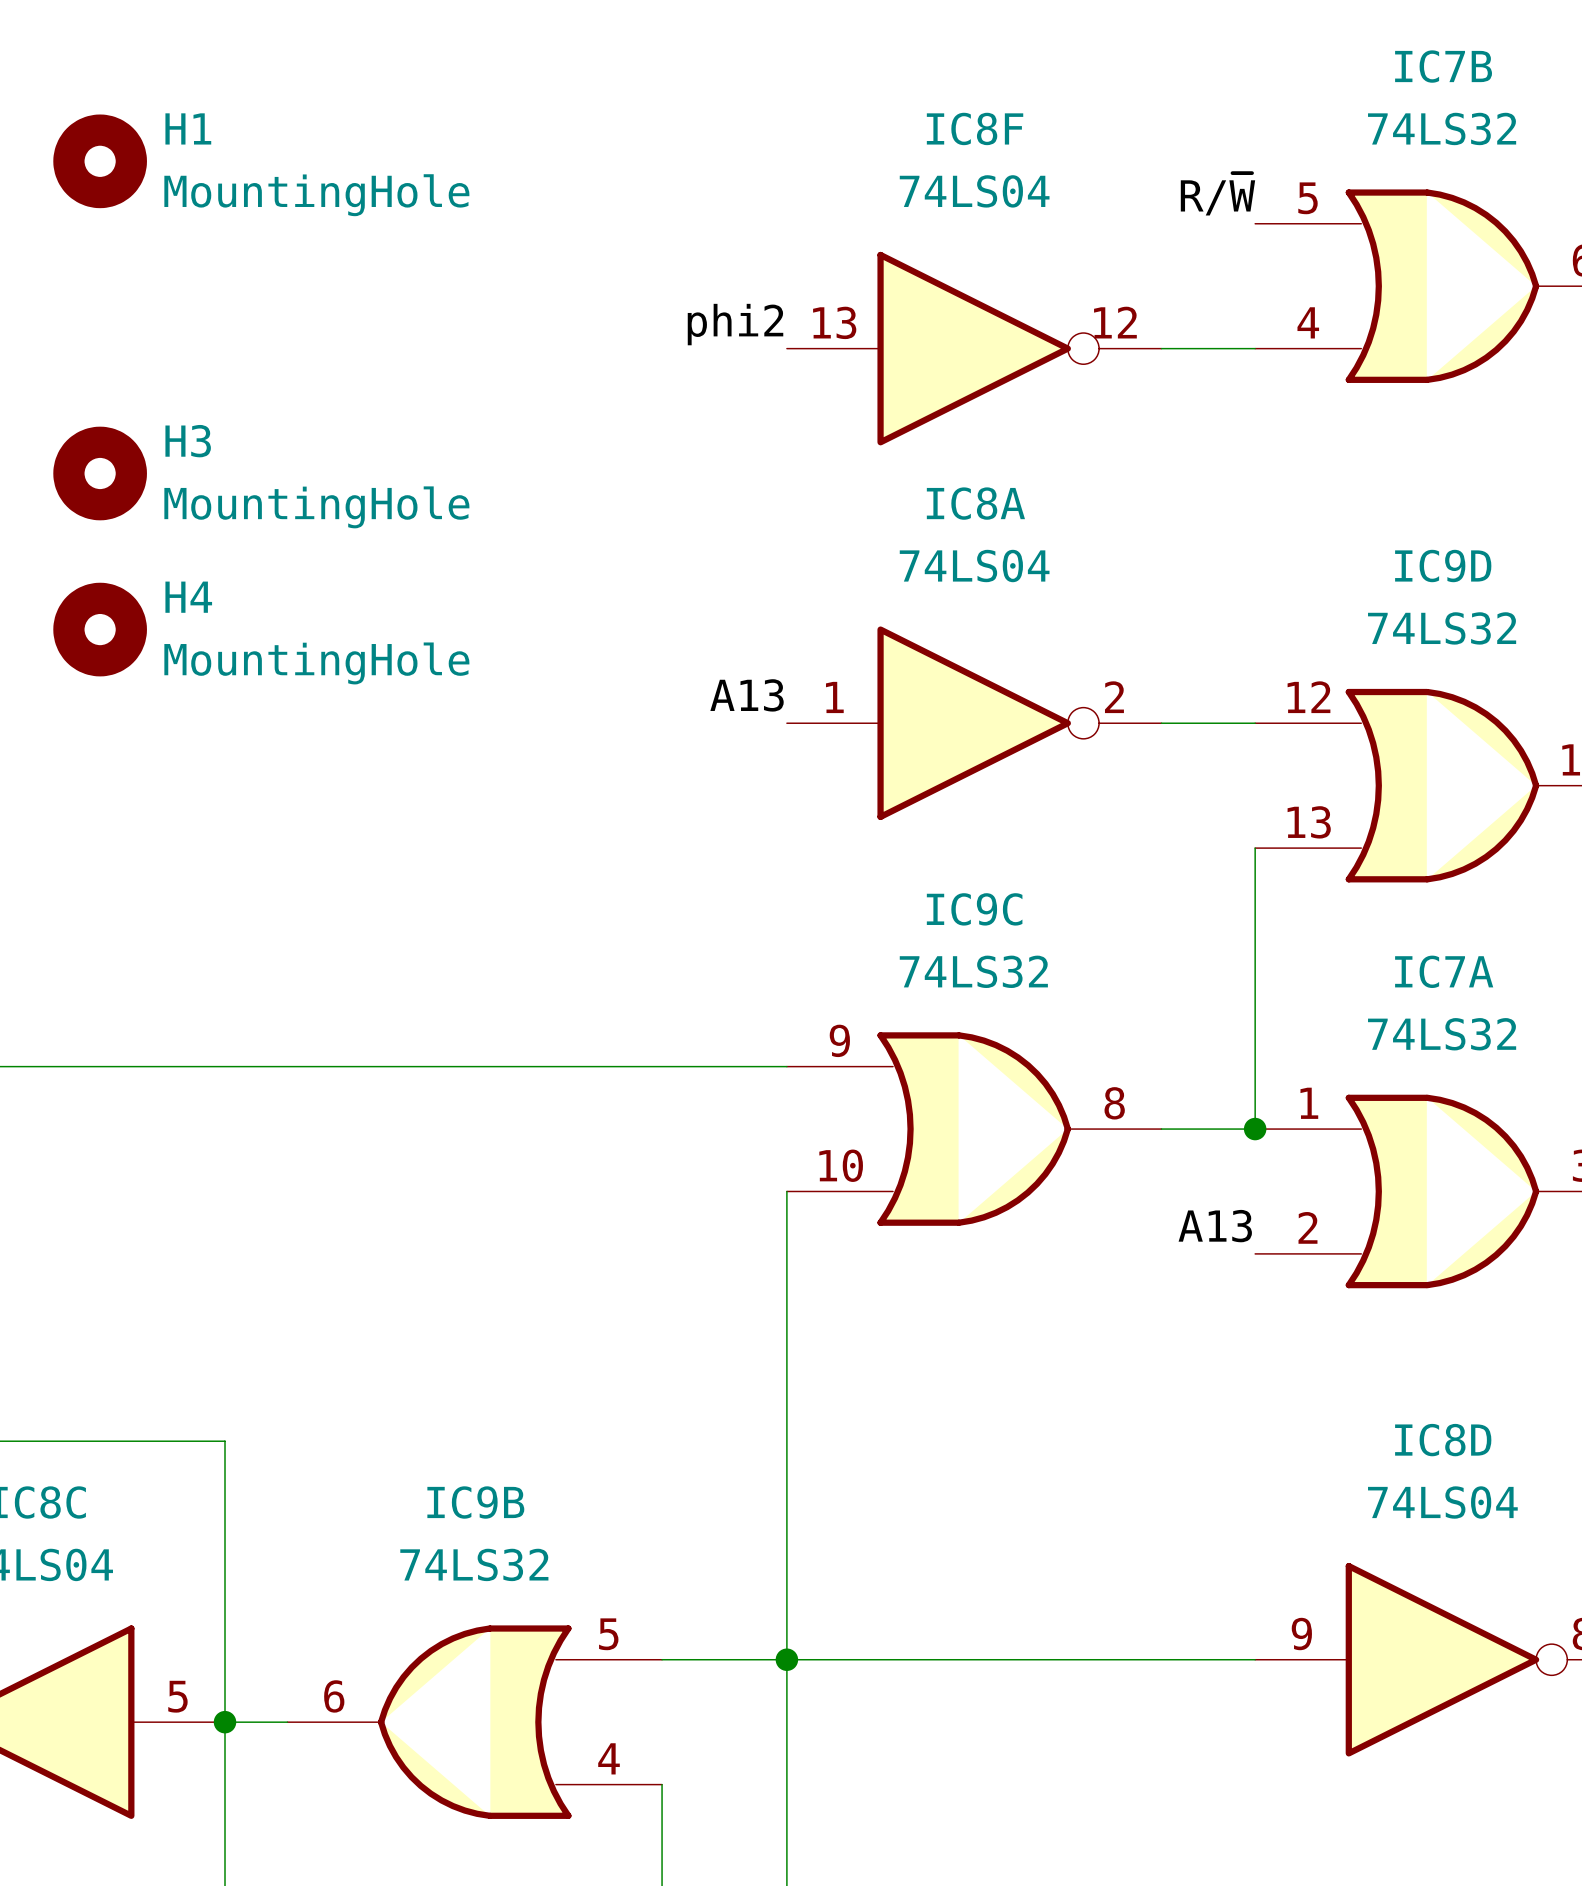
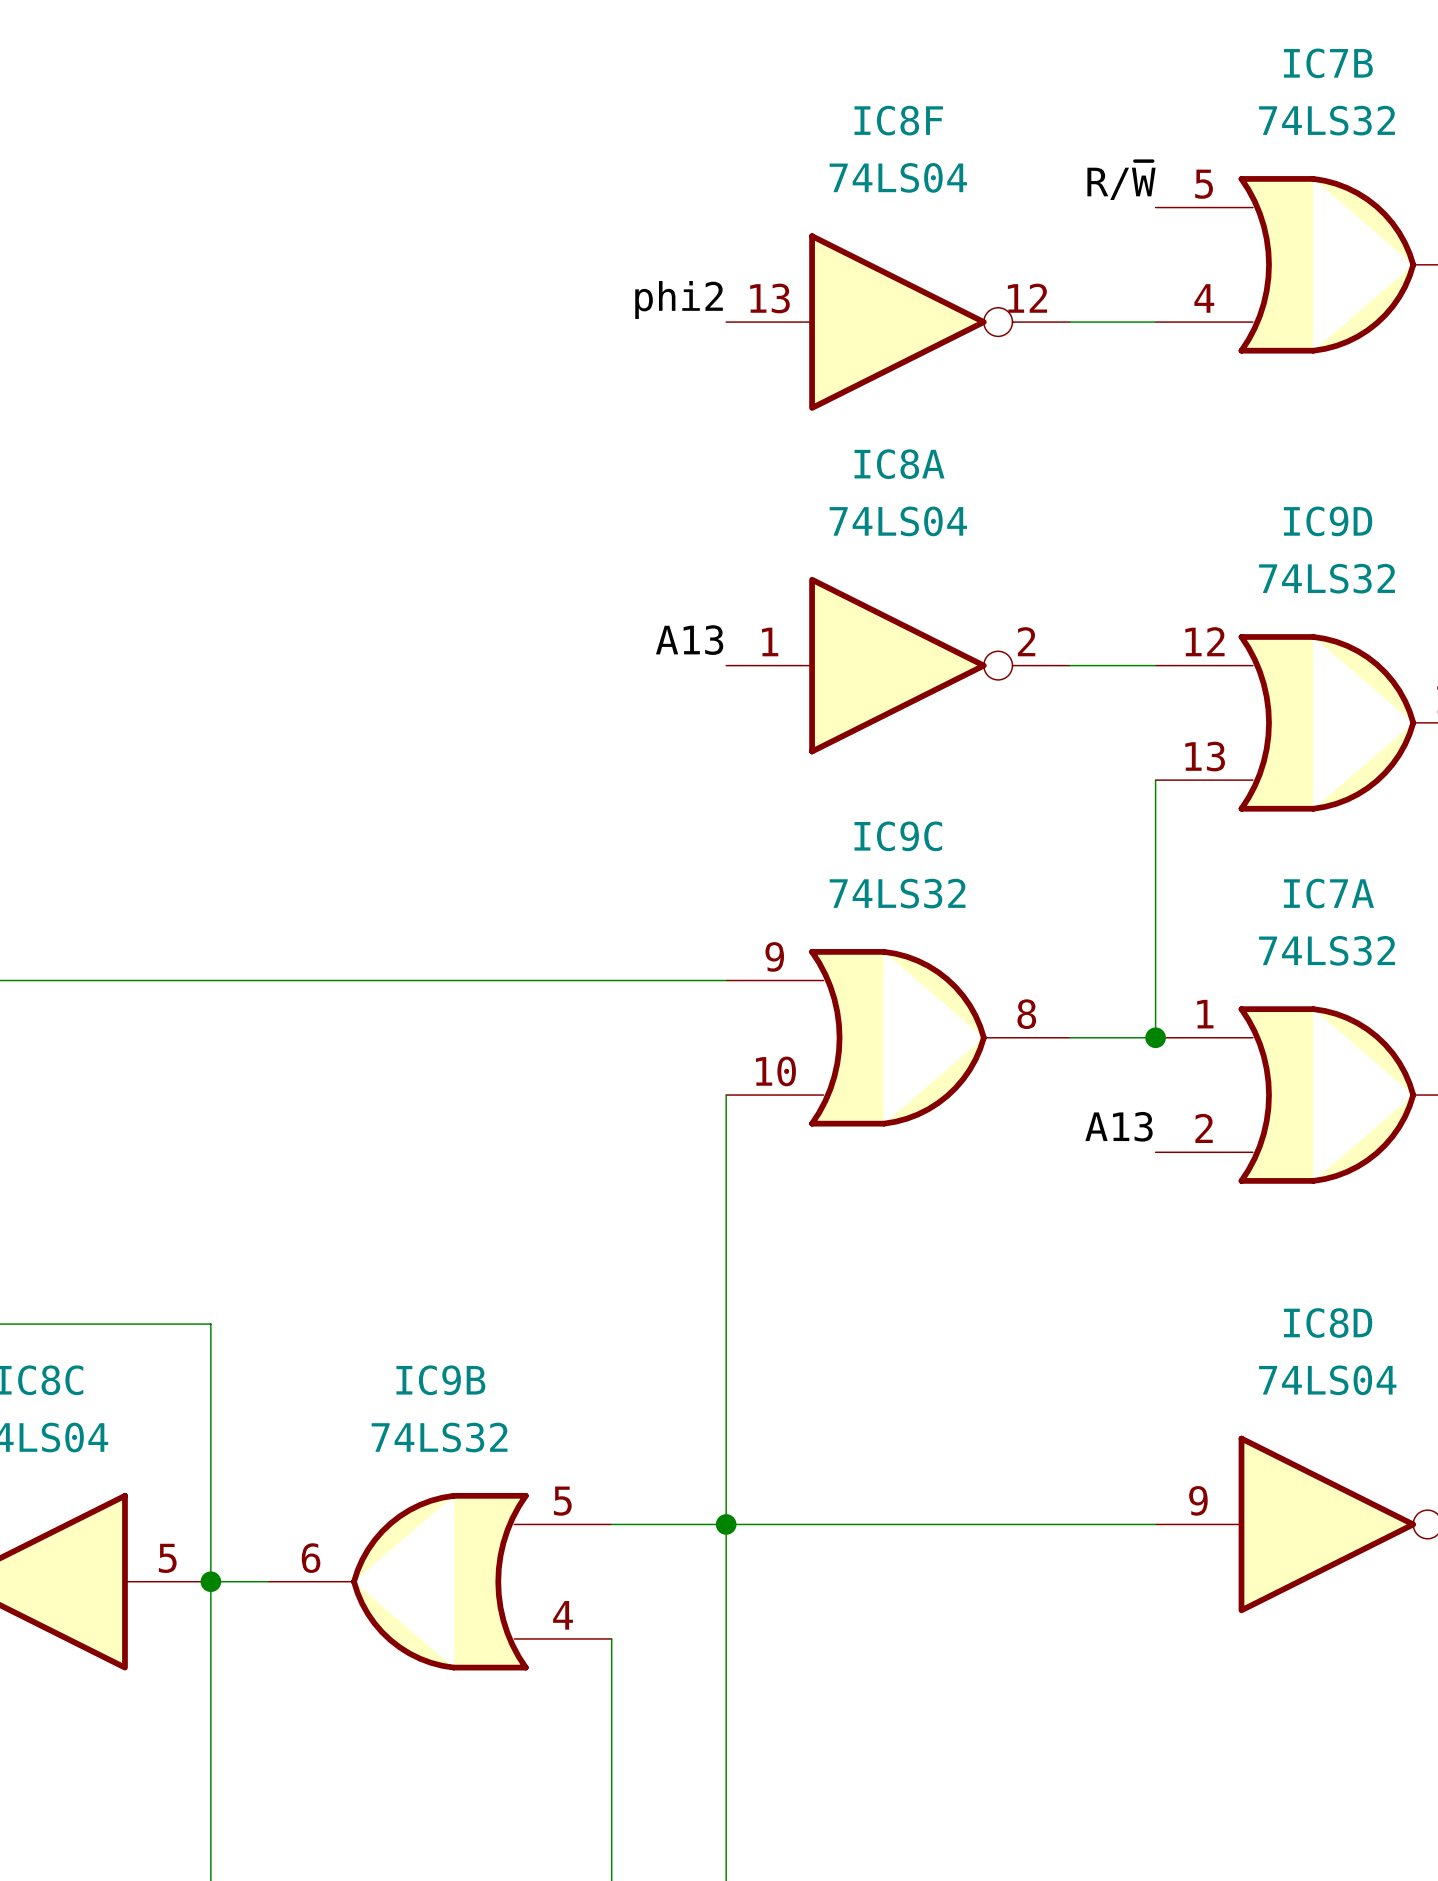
H1: MountingHole (100, 161) -> none
H3: MountingHole (100, 473) -> none
H4: MountingHole (100, 629) -> none

